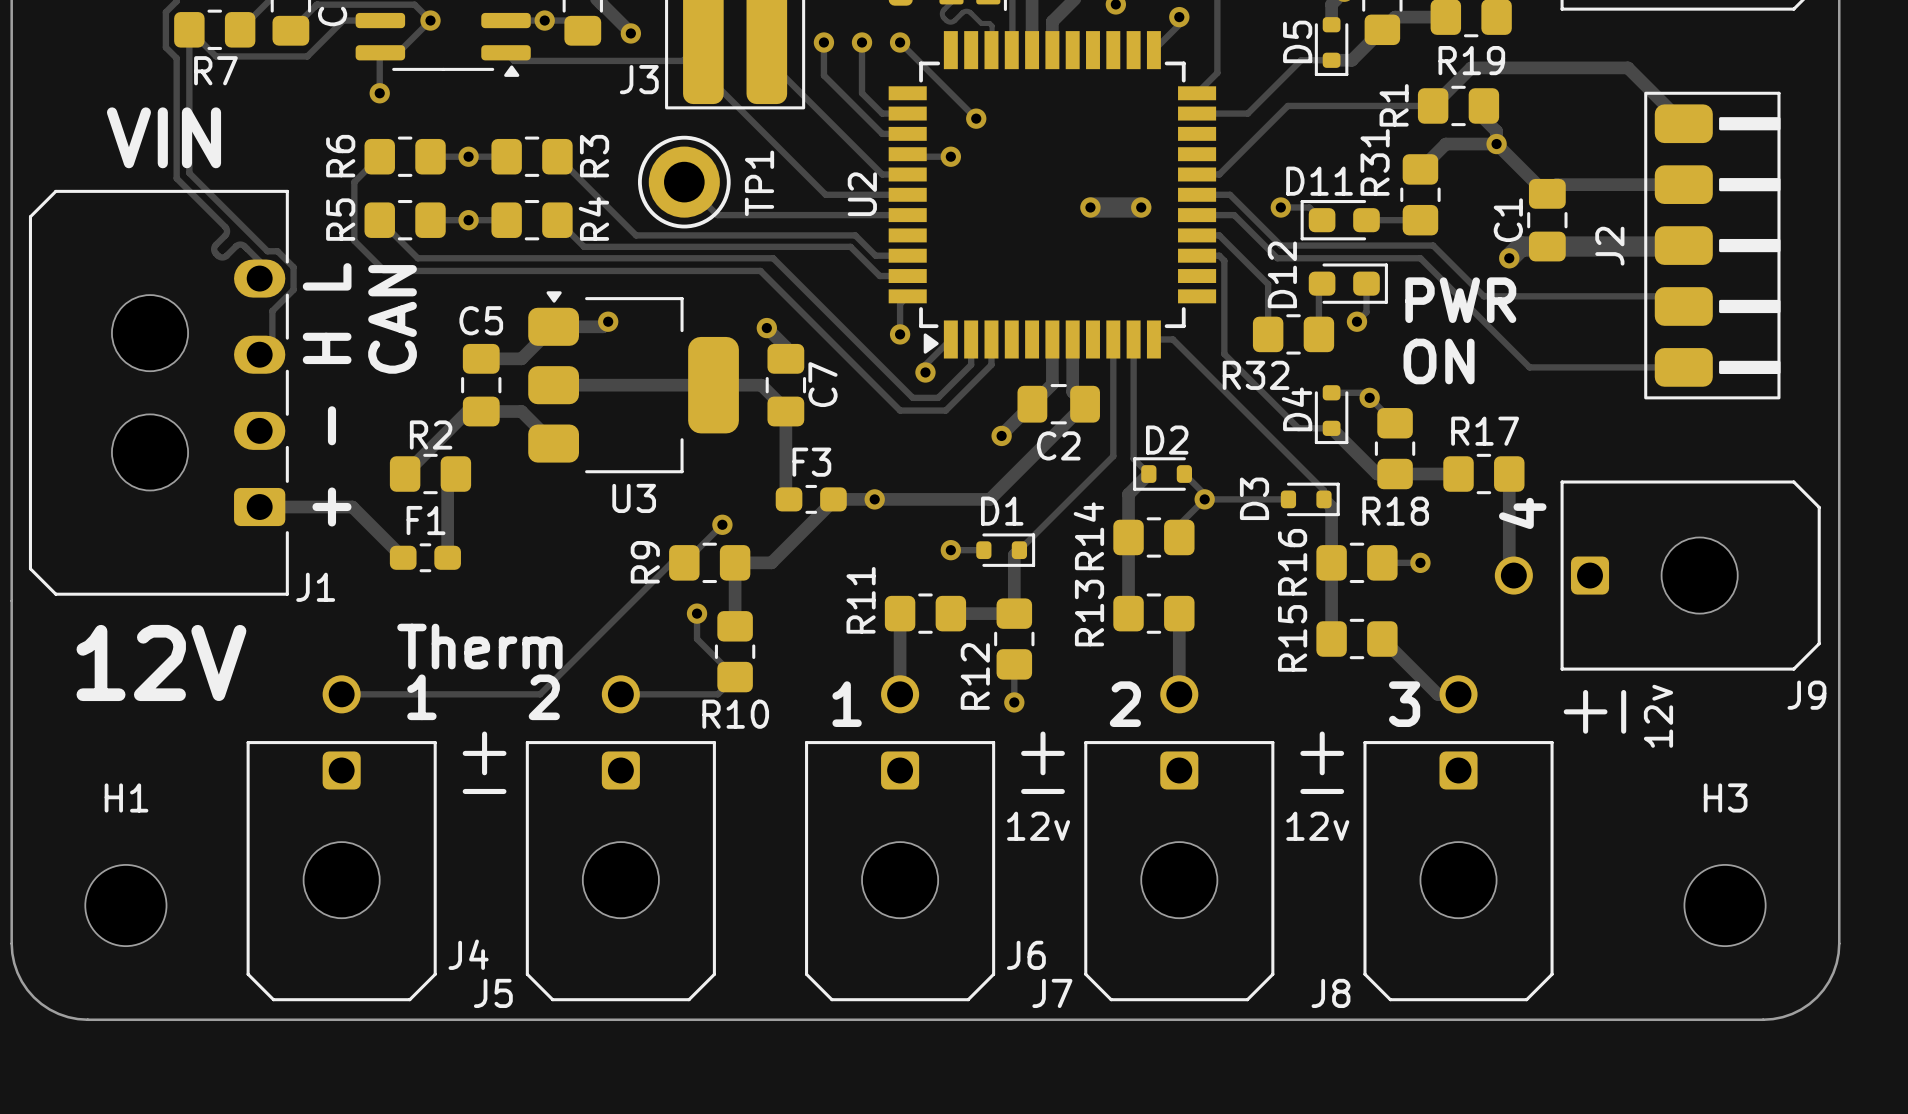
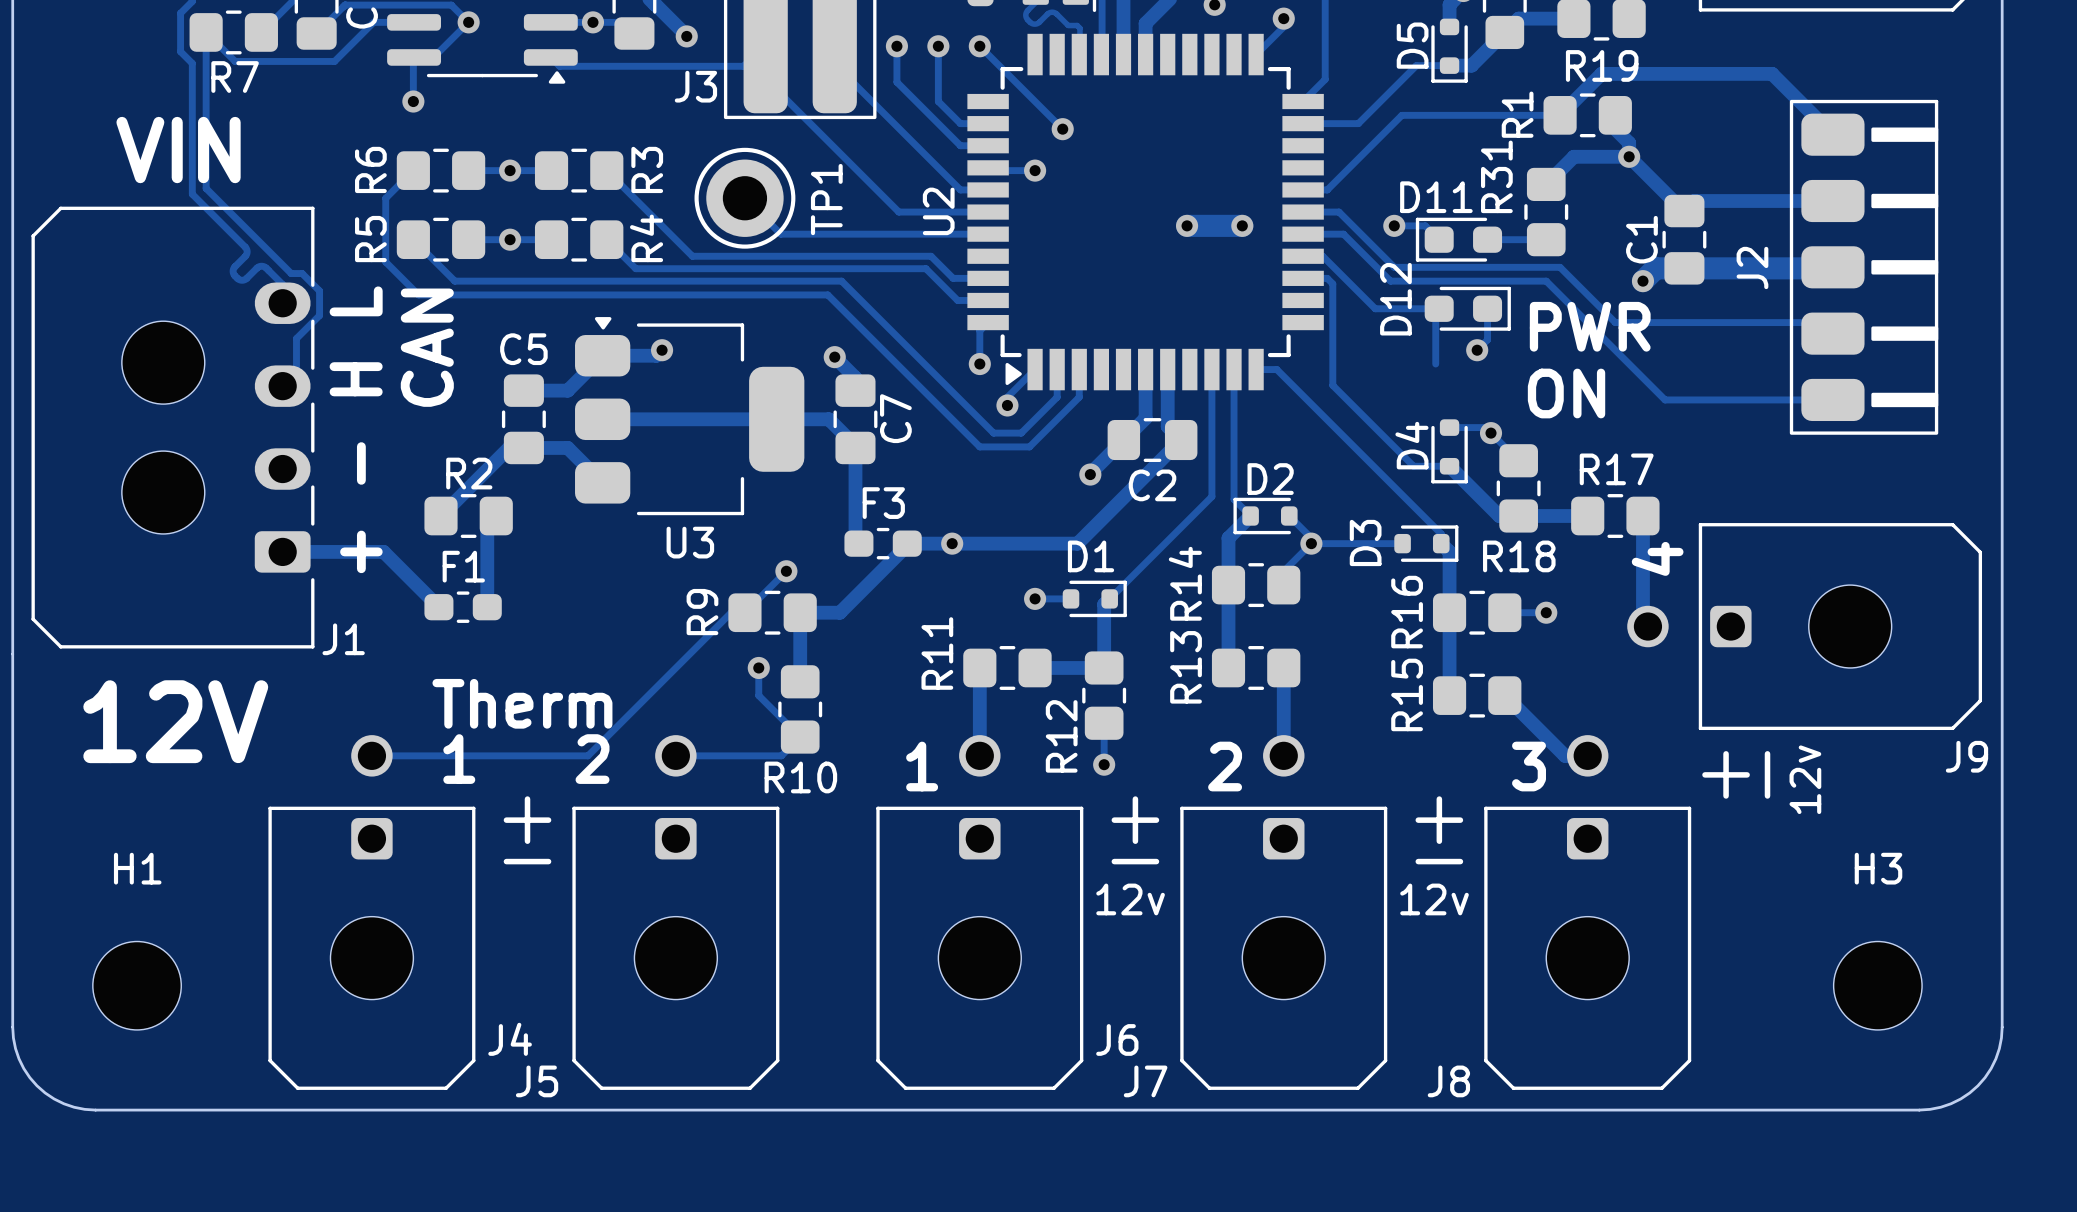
track: (1215, 235) (1219, 235) (1268, 284) (1268, 334) -> (1322, 256) (1375, 308) (1439, 308)
R32: (1293, 334) -> none

